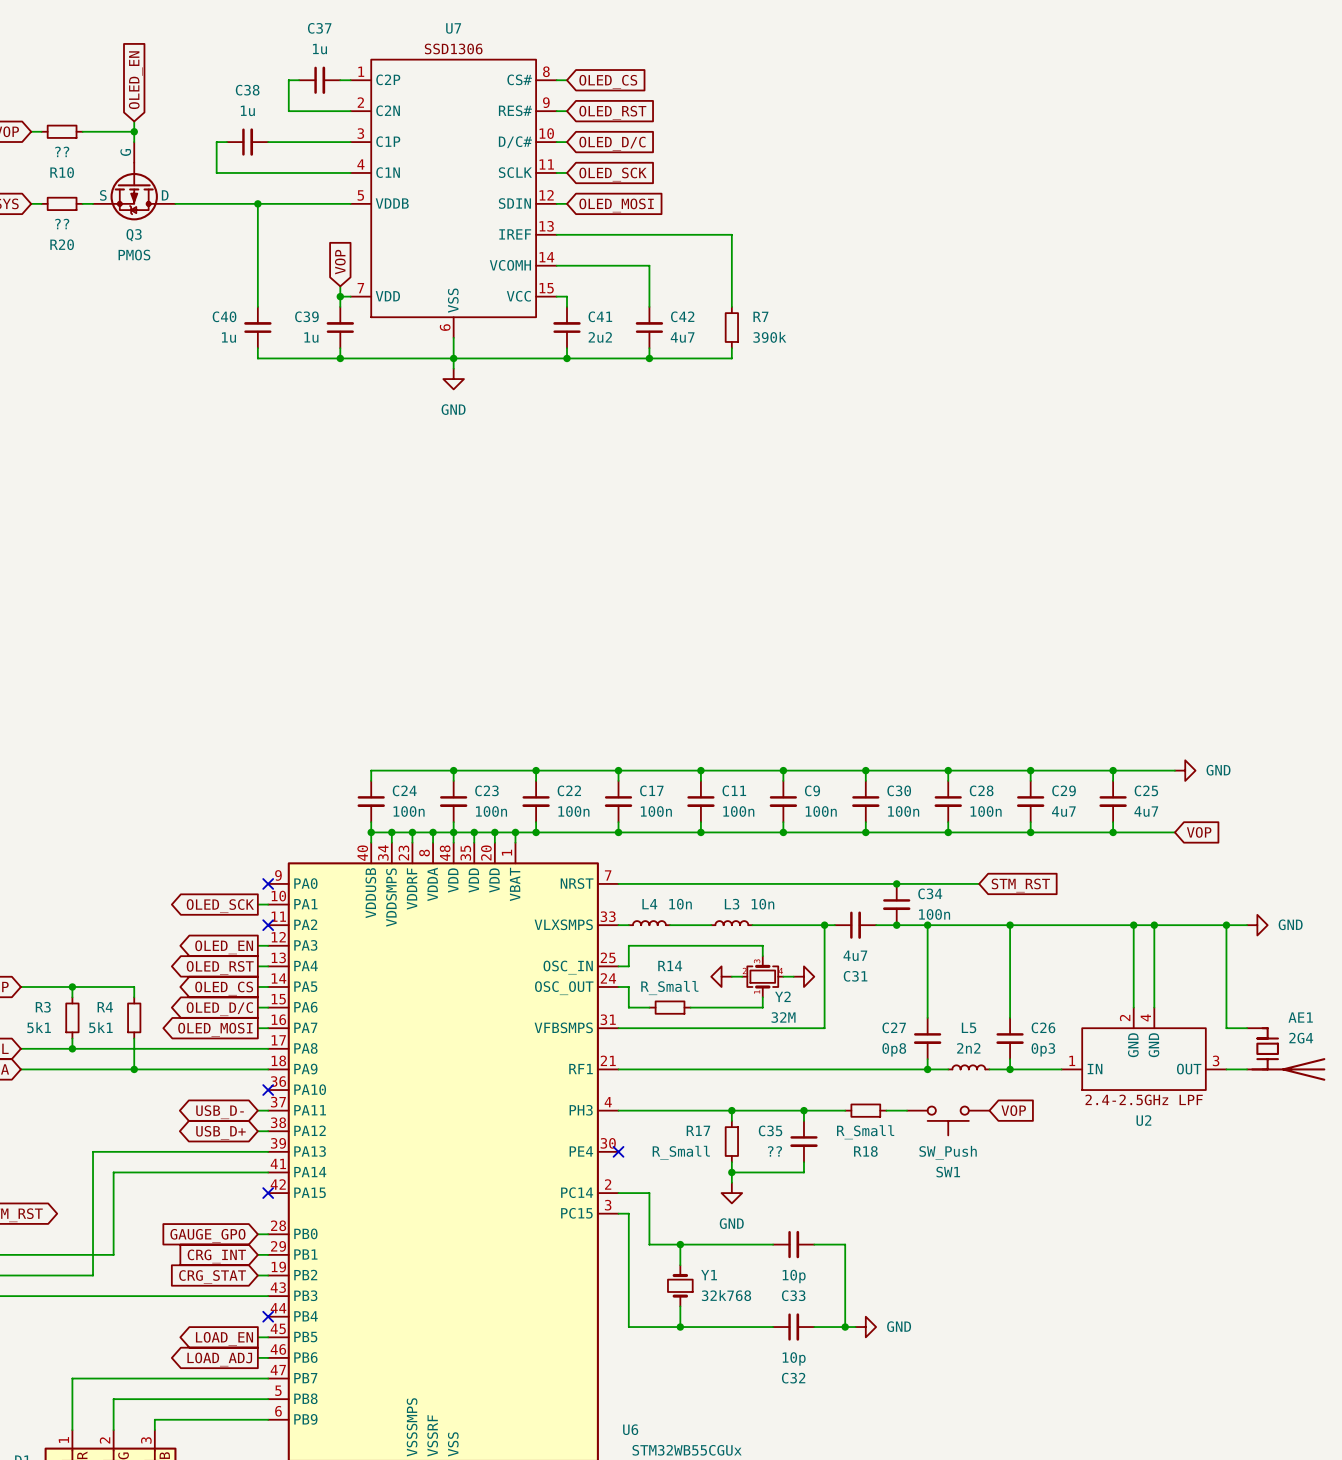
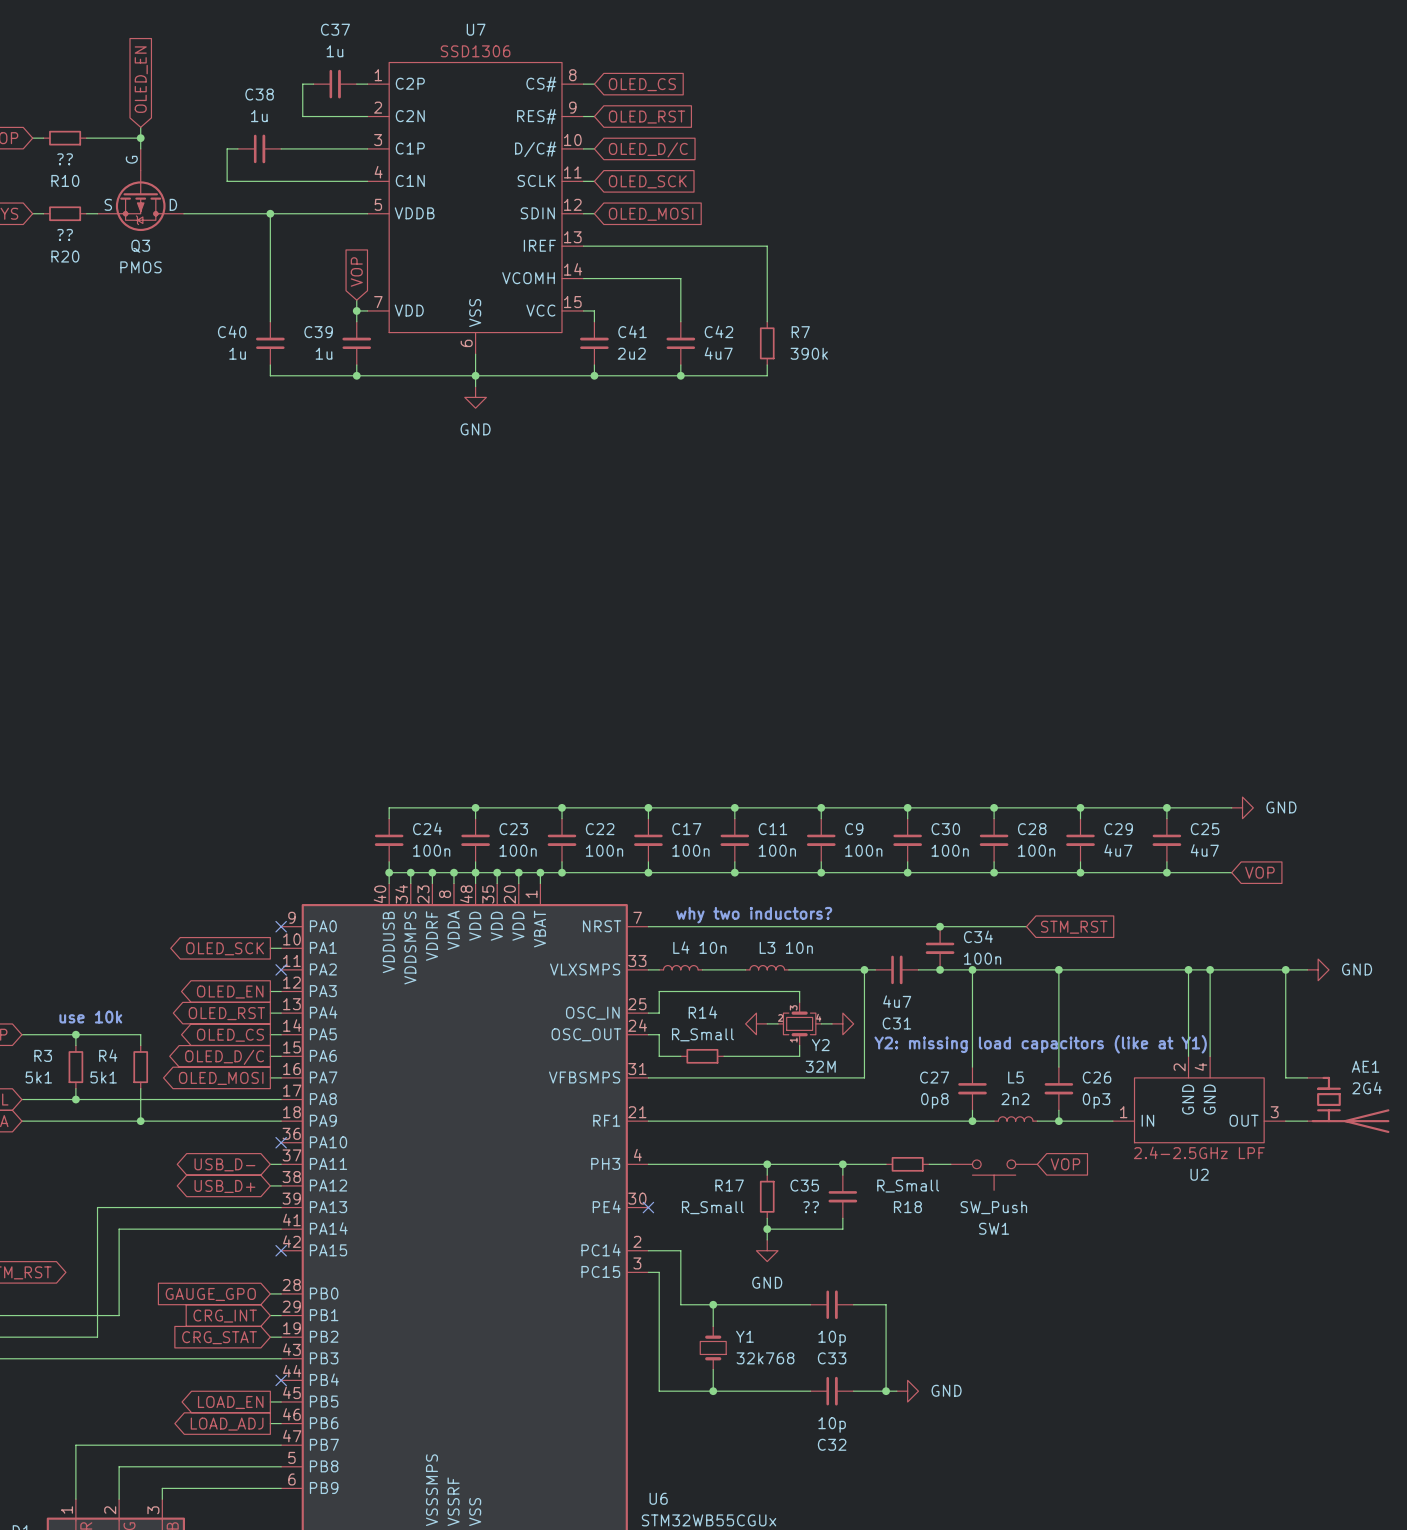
text: none -> why two inductors? (754, 915)
text: none -> use 10k (90, 1017)
text: none -> Y2: missing load capacitors (like at Y1) (1040, 1044)

